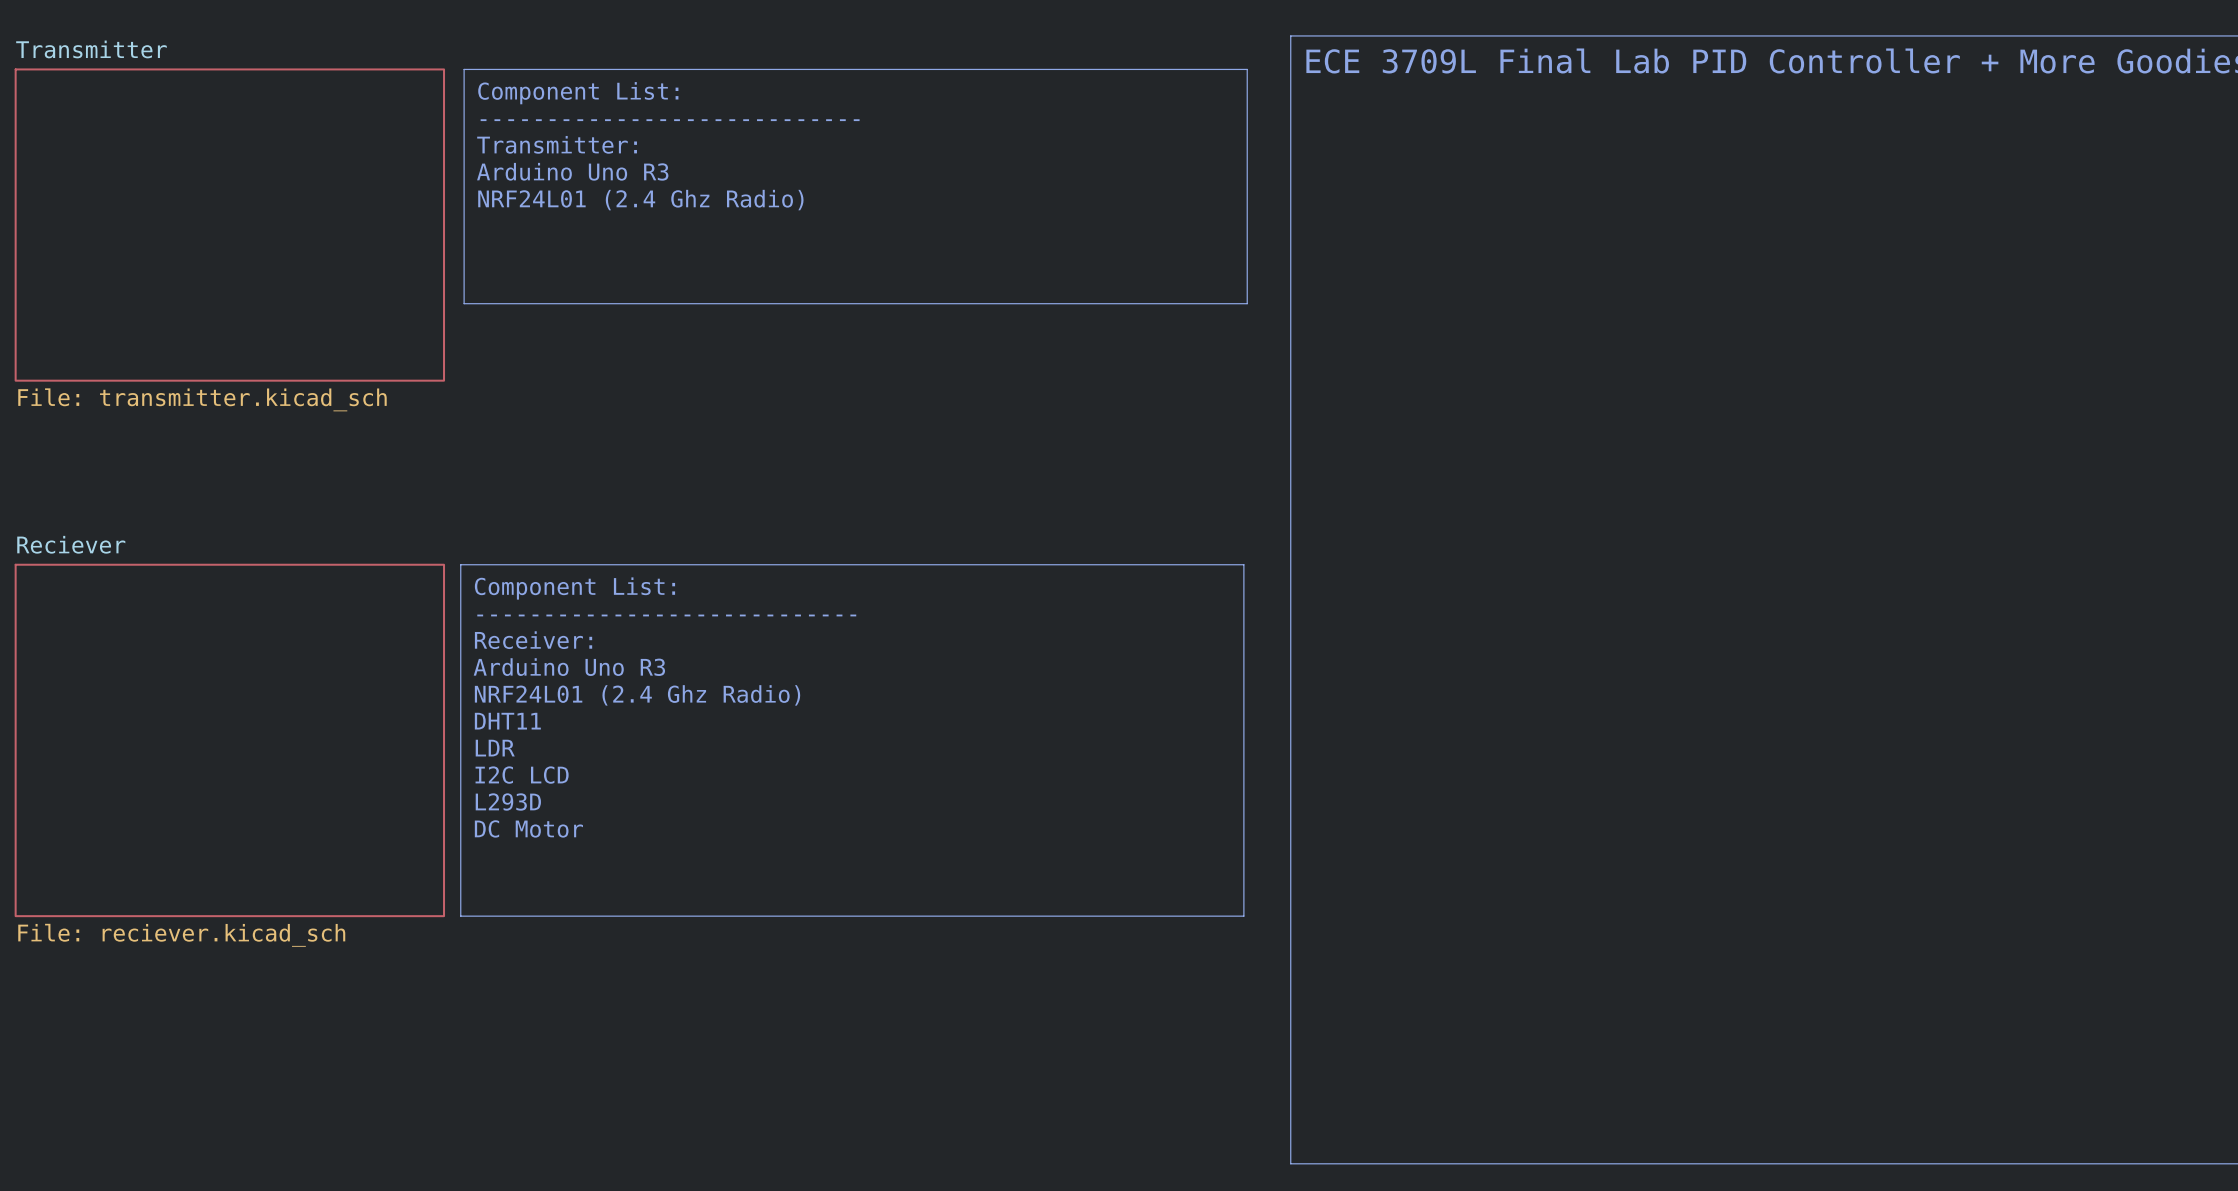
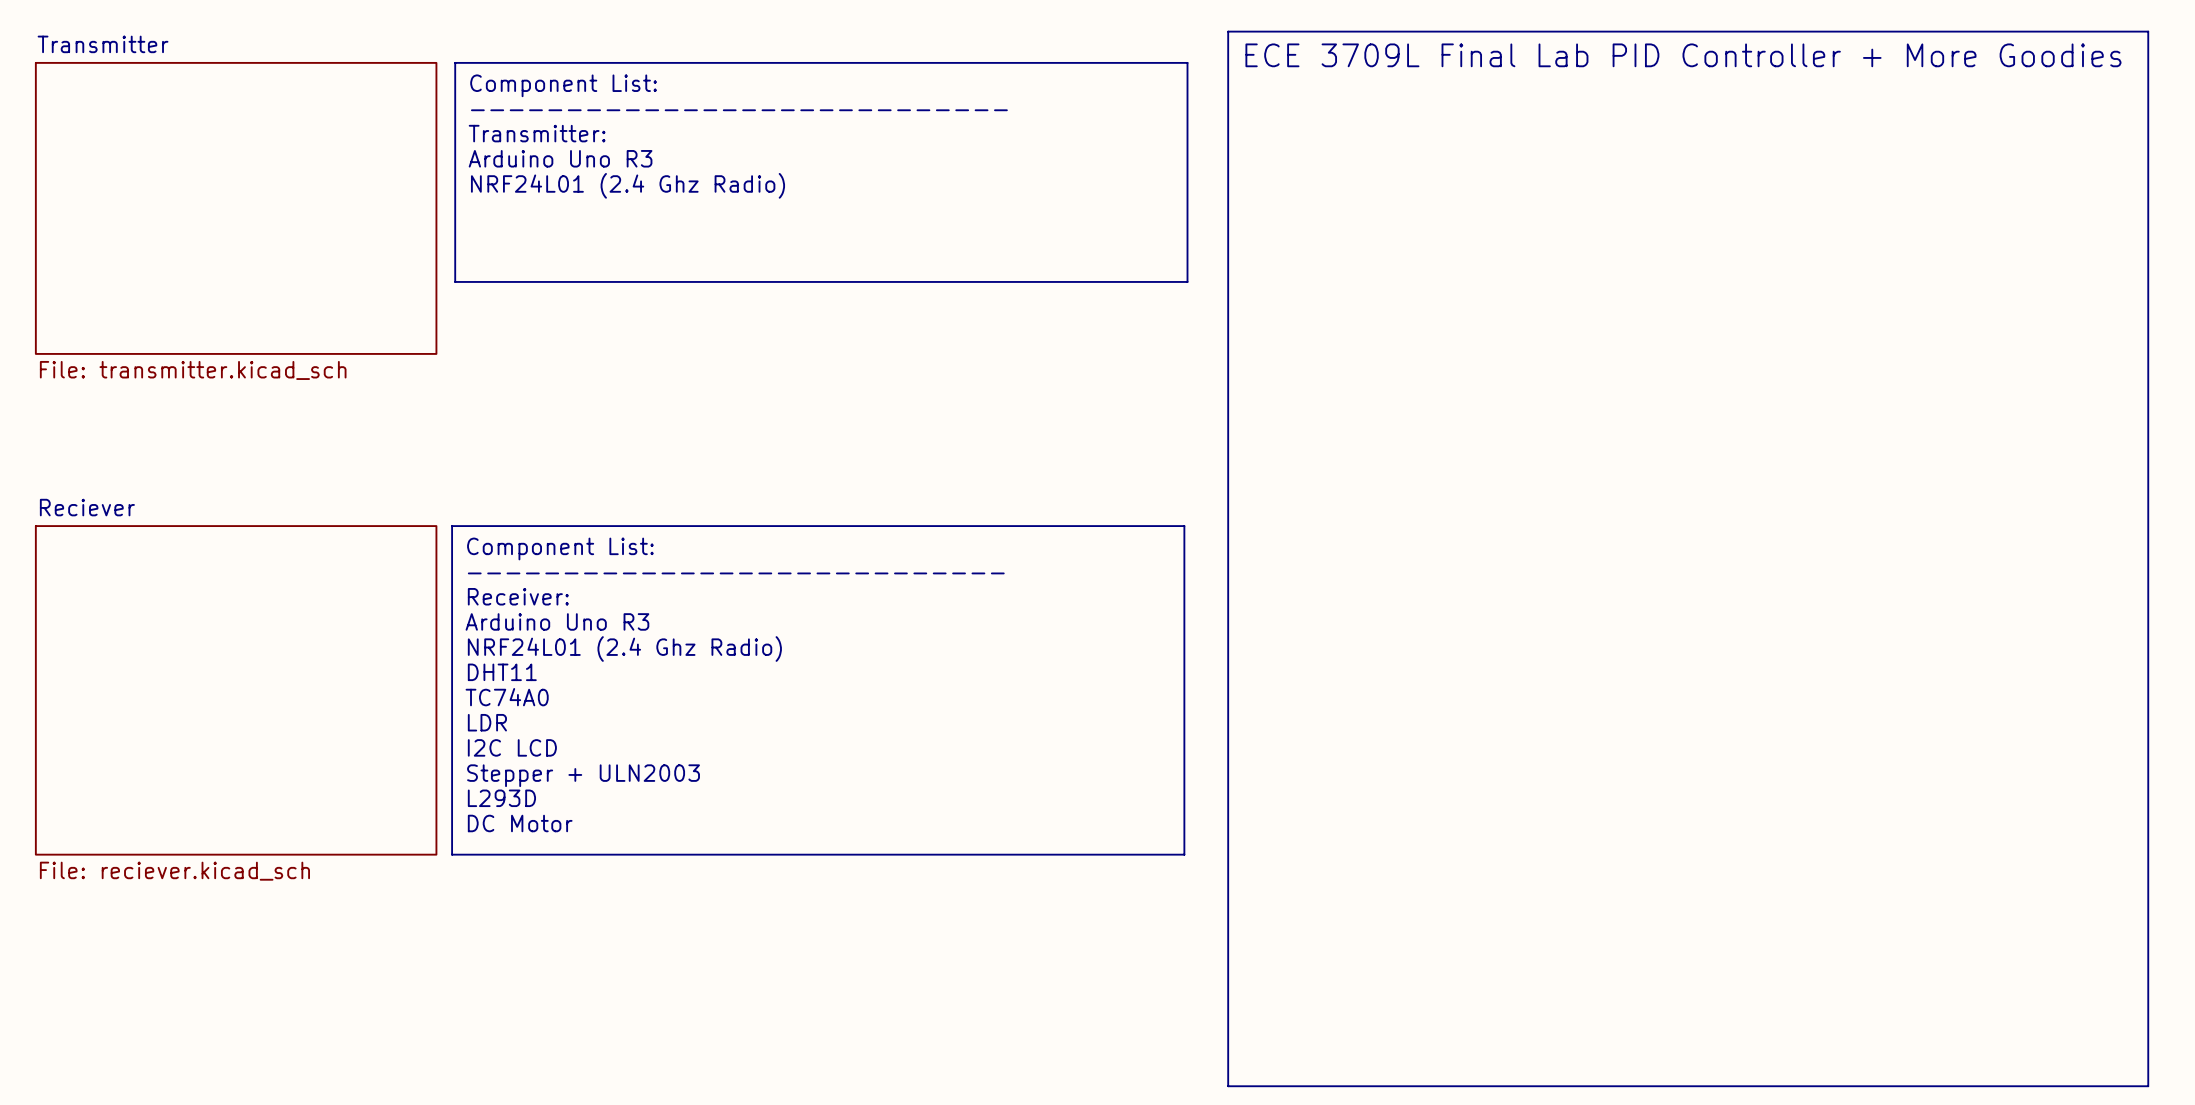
text: LDR (495, 748) -> TC74A0 (507, 697)
text: I2C LCD (522, 775) -> LDR (487, 722)
text: L293D (508, 802) -> I2C LCD (512, 747)
text: DC Motor (528, 828) -> Stepper + ULN2003 (583, 775)
text: none -> L293D (501, 798)
text: none -> DC Motor (520, 823)

